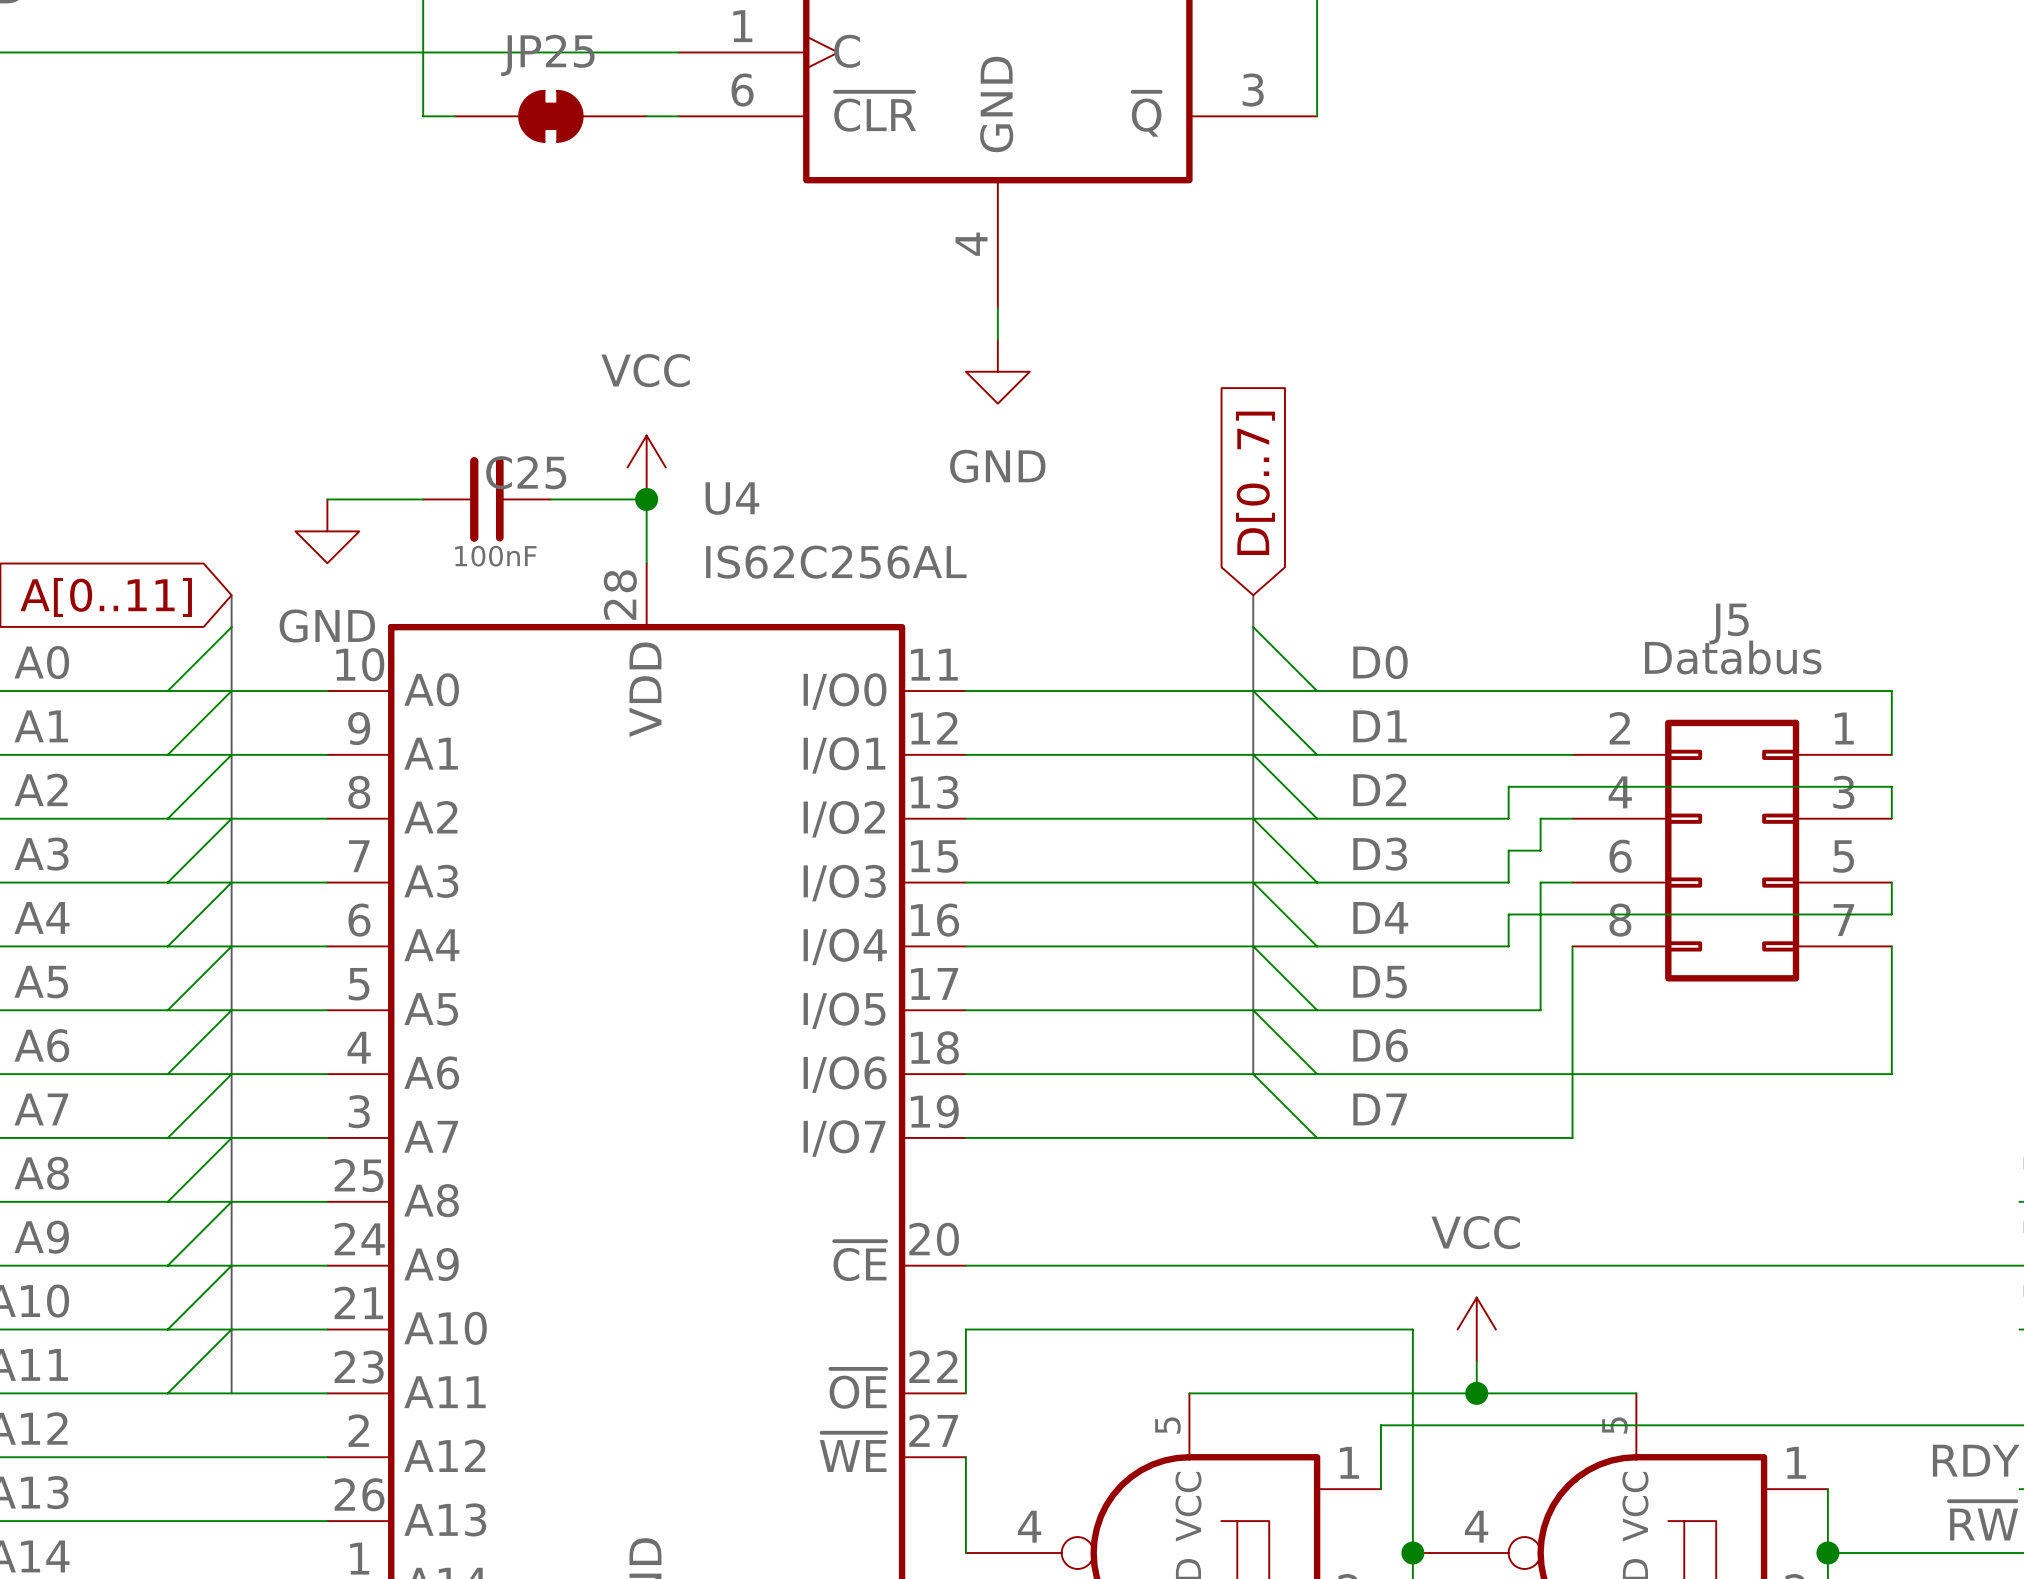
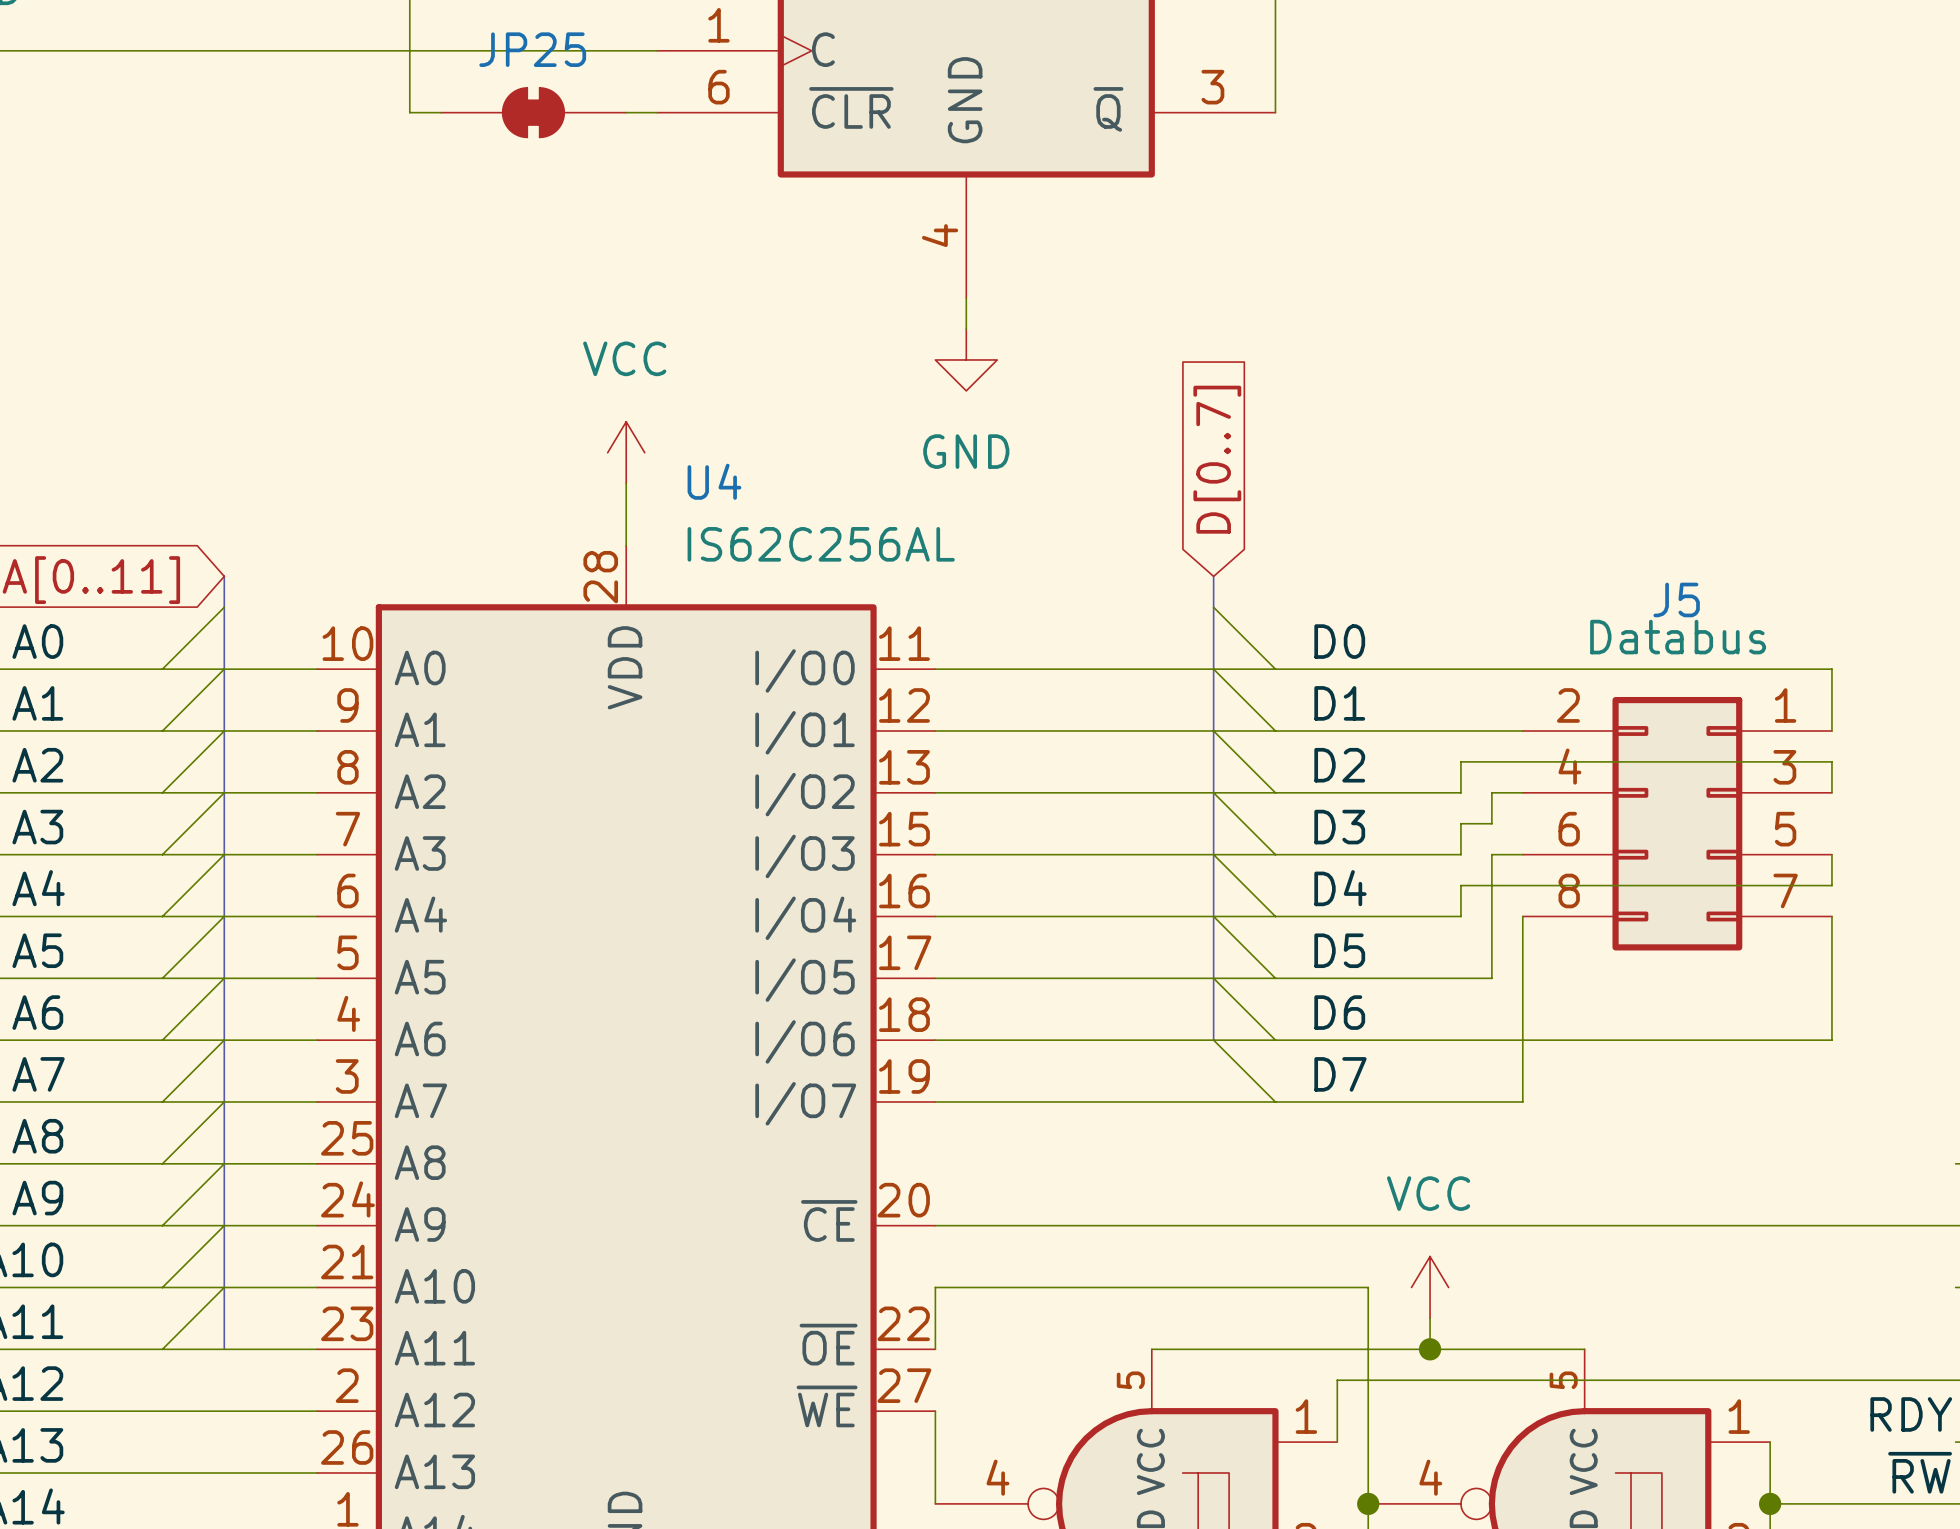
wire: (327, 499) (423, 499) -> none
C25: 100nF (487, 499) -> none
wire: (550, 499) (646, 499) -> none
junction: (646, 499) -> none
power symbol: GND (327, 531) -> none

